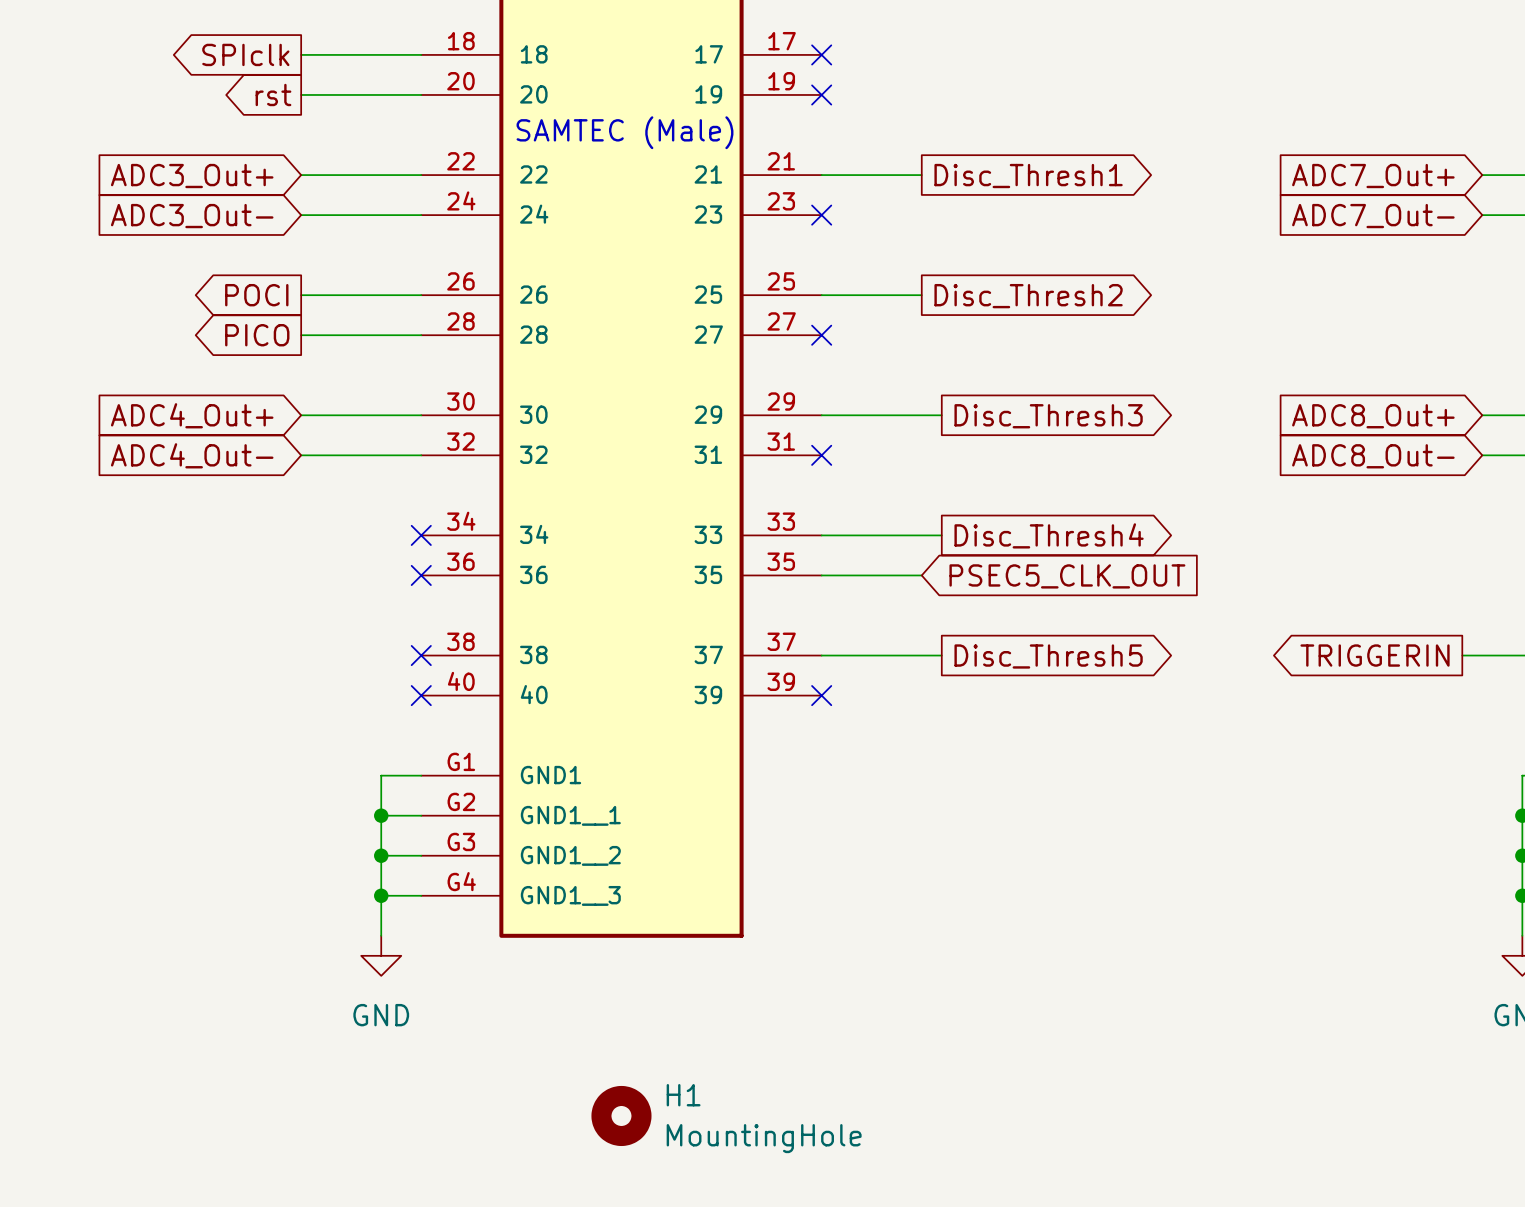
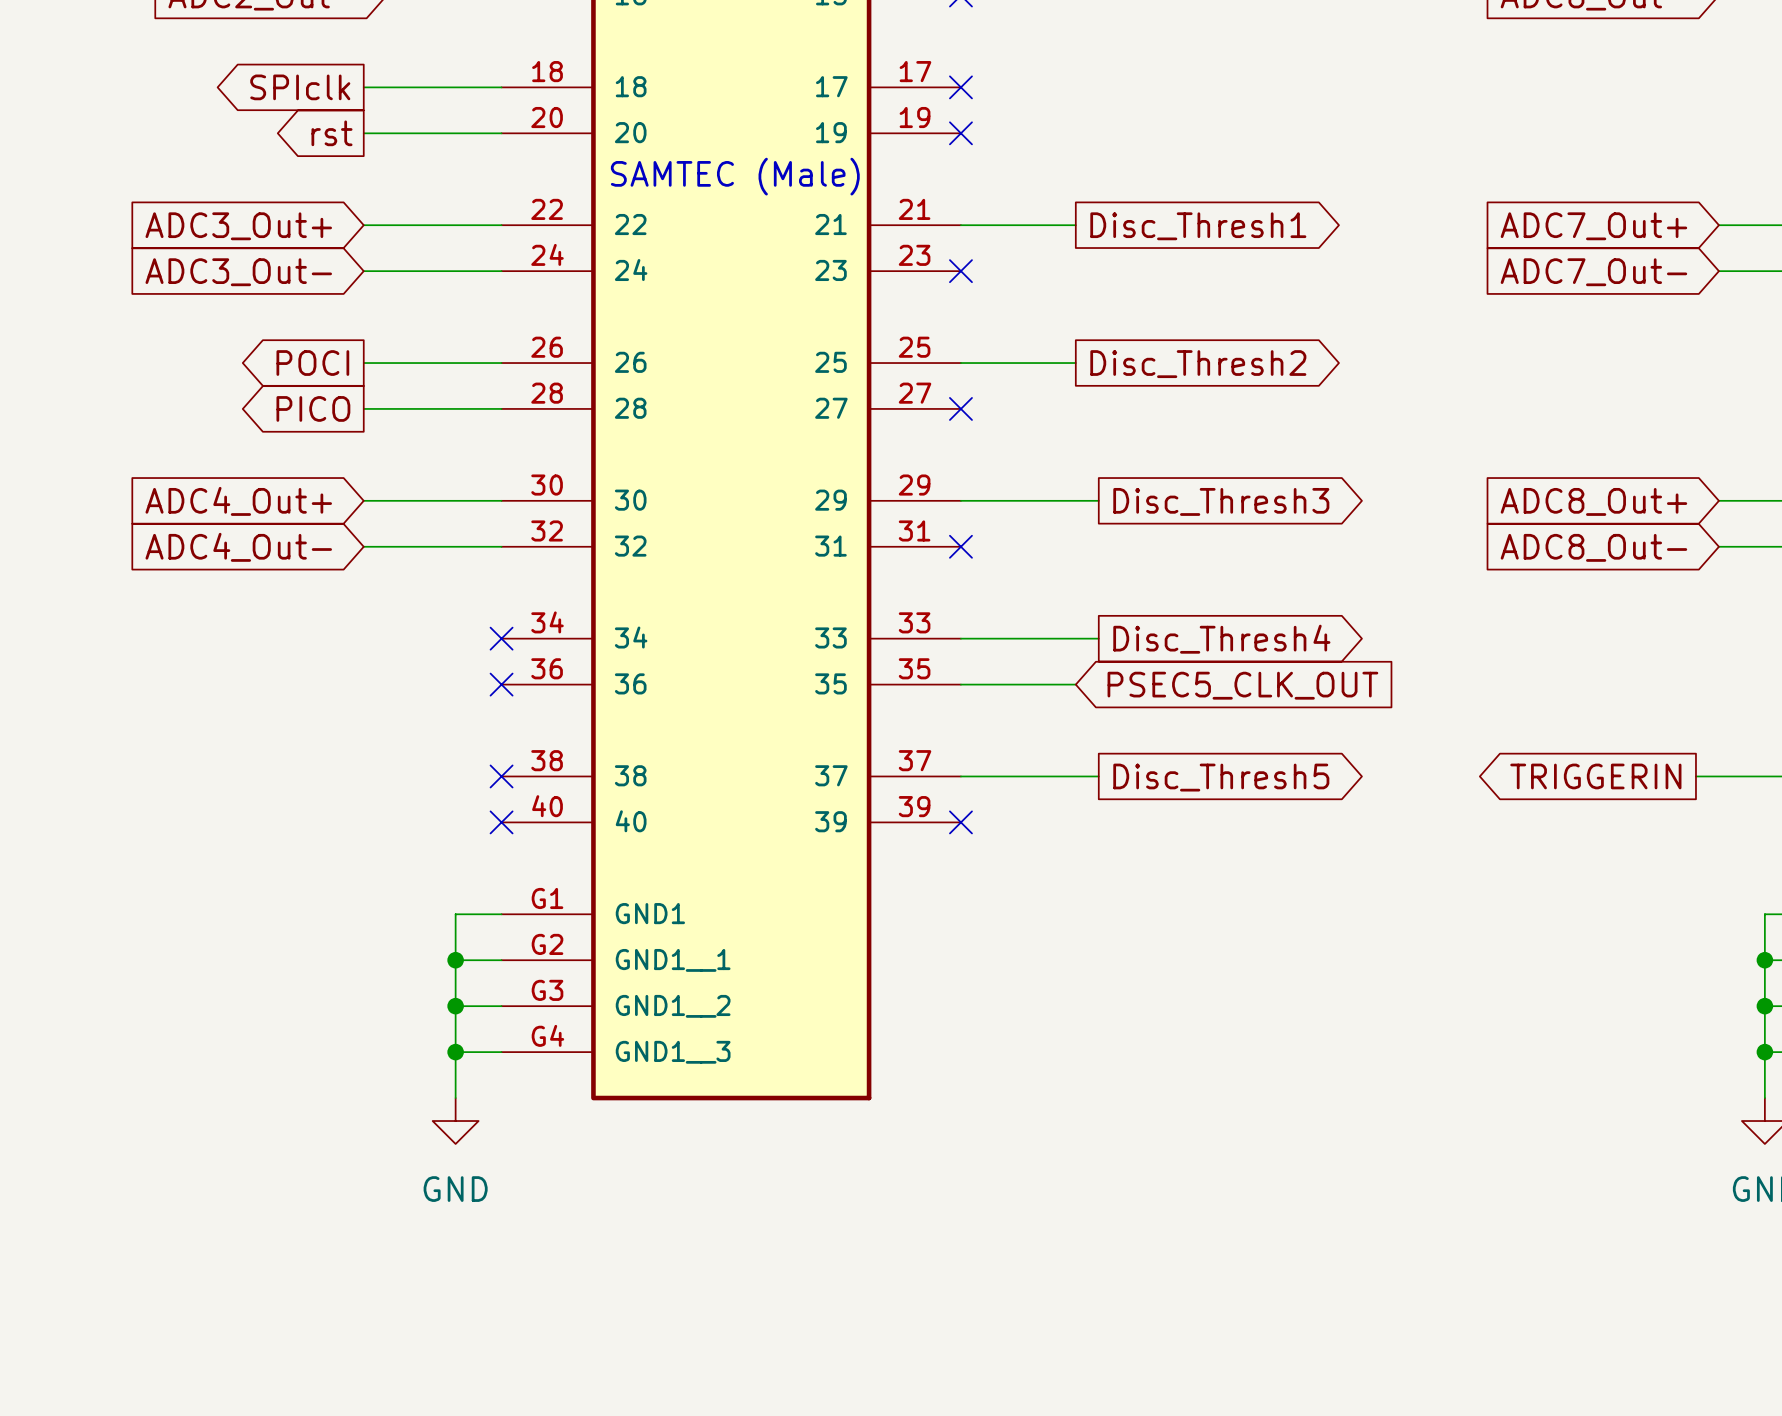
H1: MountingHole (621, 1115) -> none

